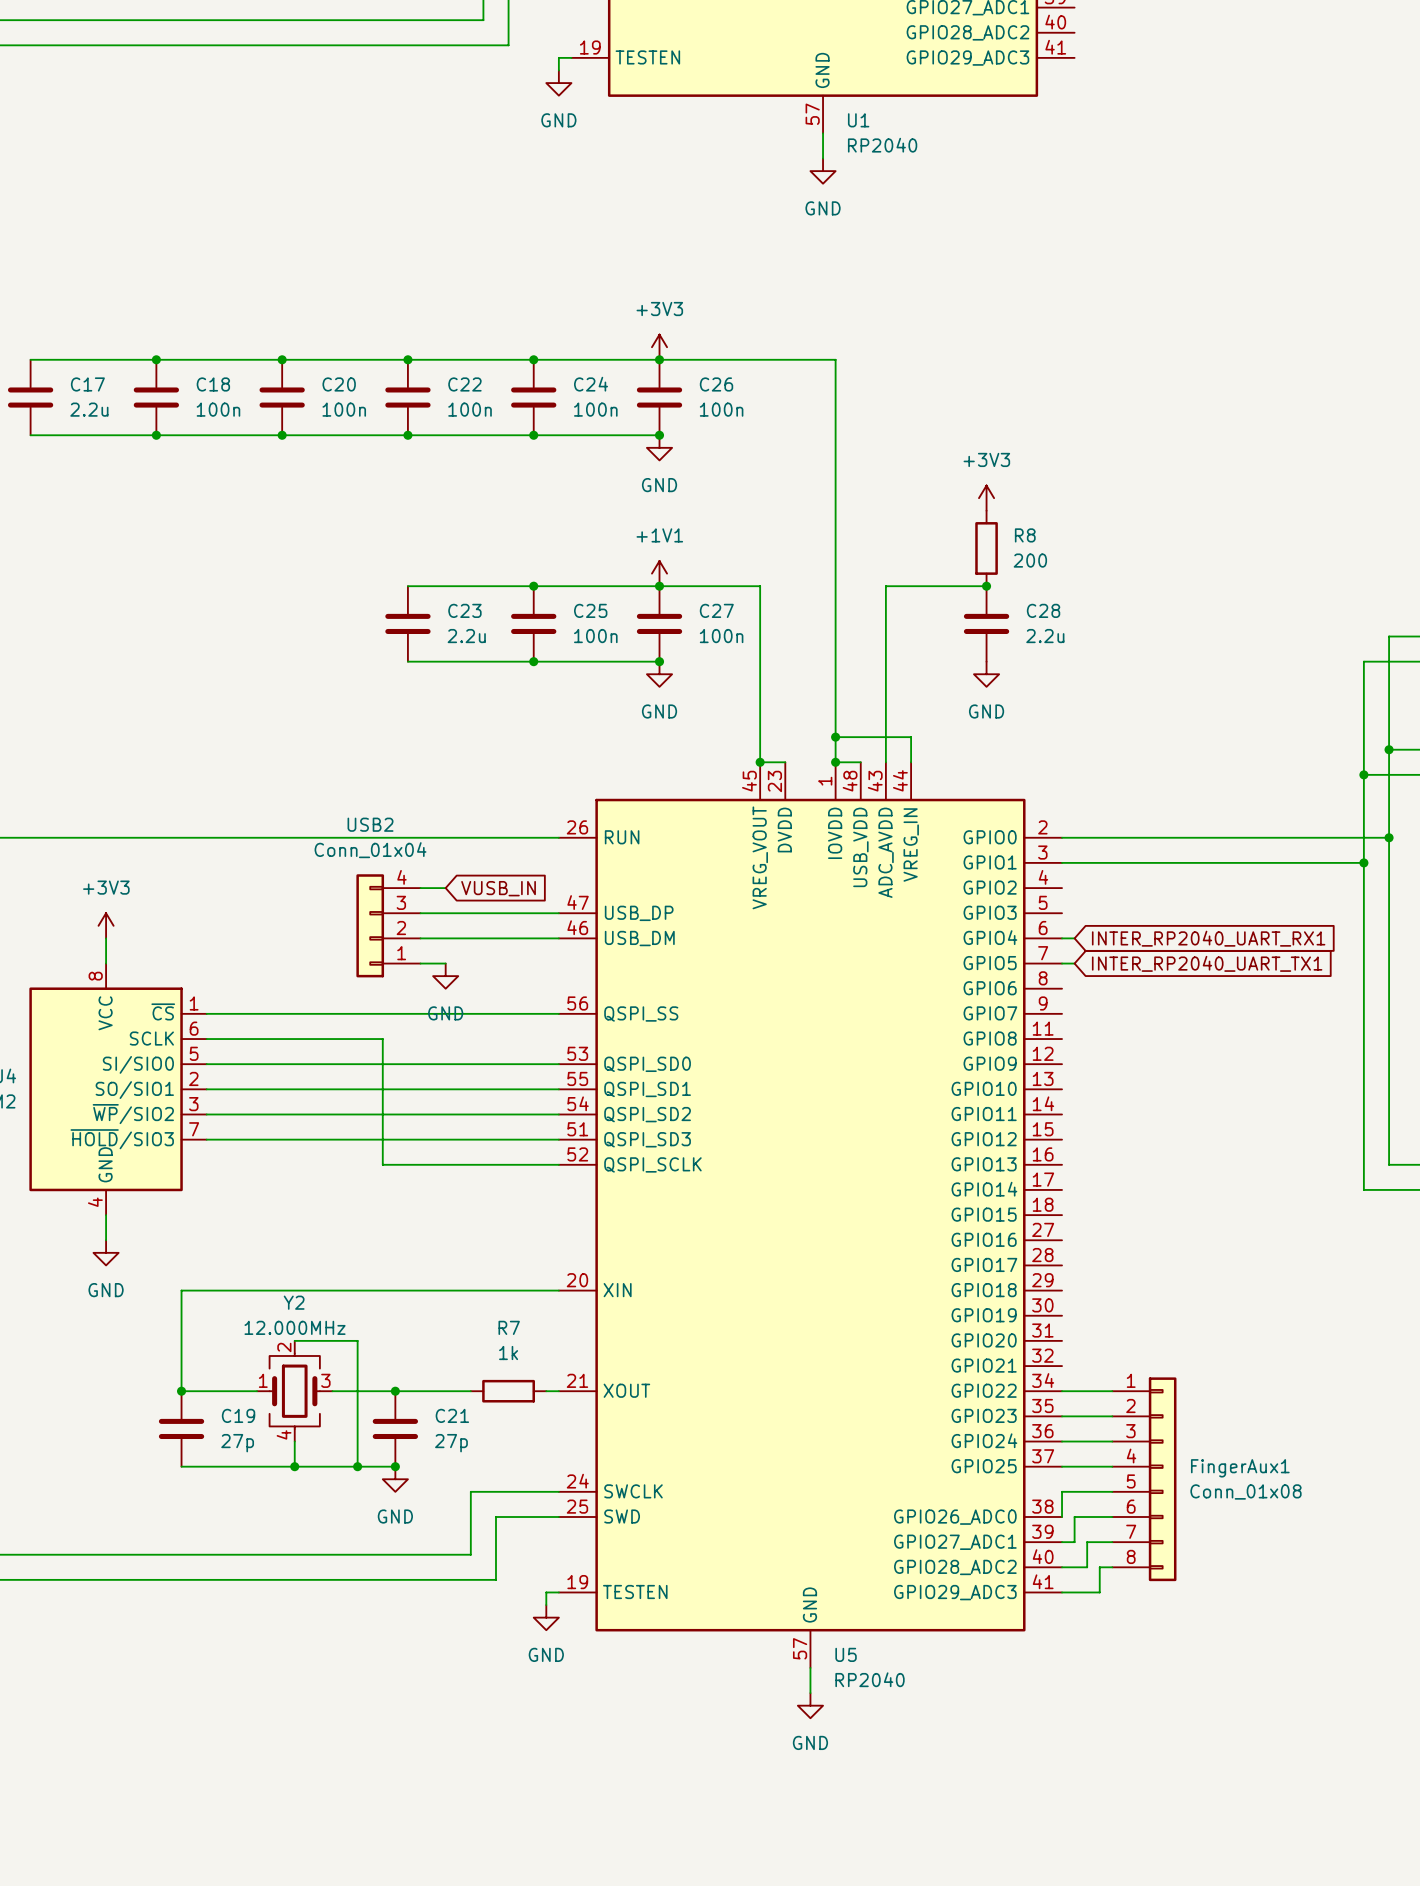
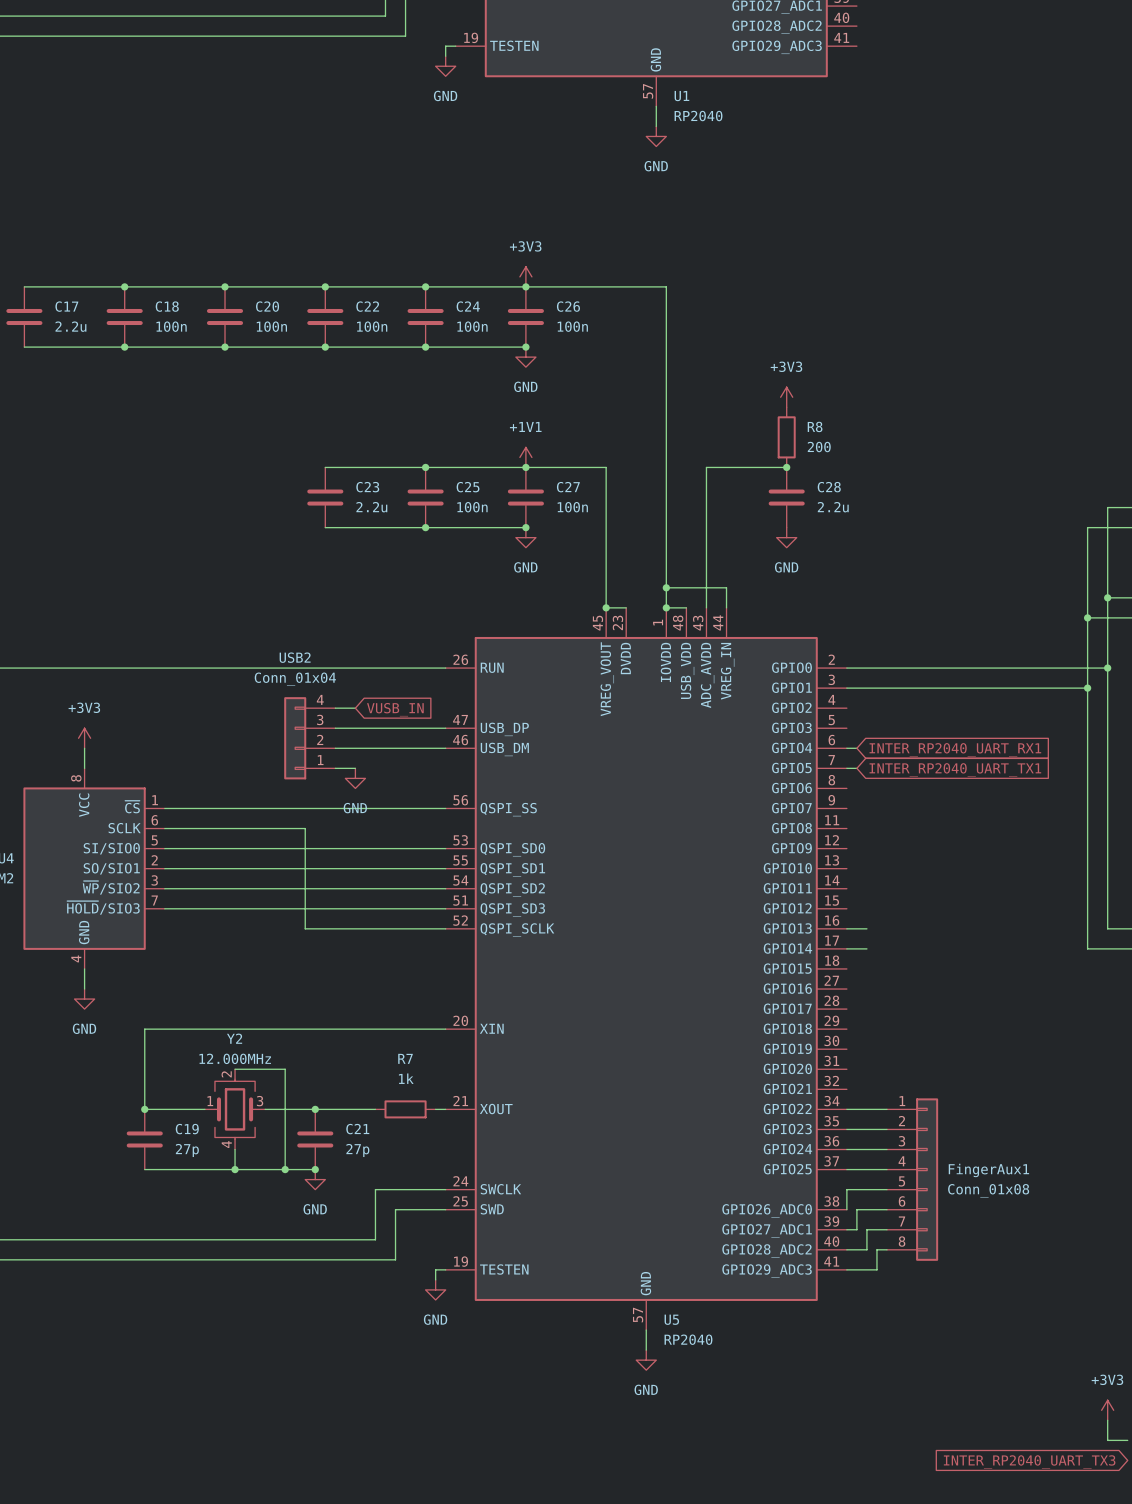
wire: none -> (846, 928) (866, 928)
wire: none -> (846, 948) (866, 948)
power symbol: none -> +3V3 (1107, 1410)
wire: none -> (1107, 1420) (1107, 1440) (1127, 1440)
global label: none -> INTER_RP2040_UART_TX3 (1029, 1461)

